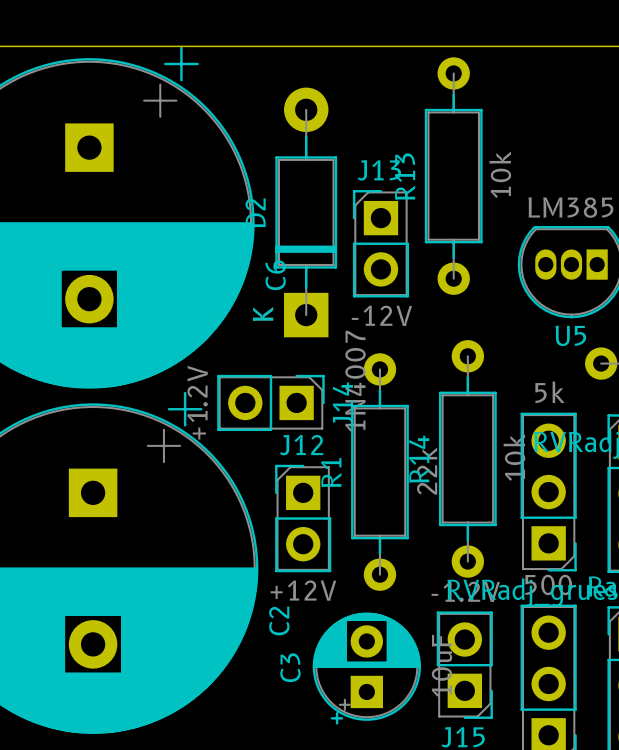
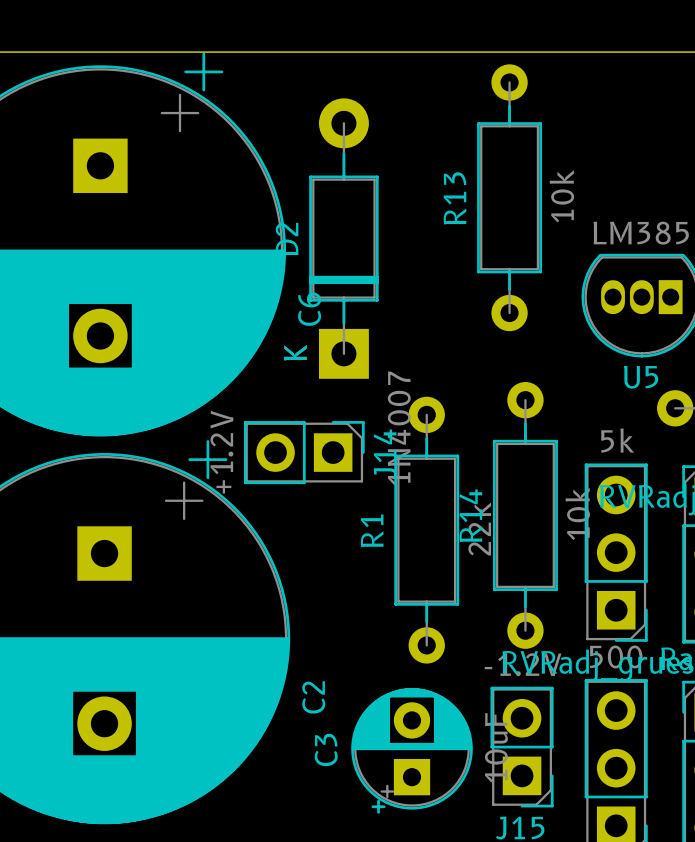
J13: -12V (380, 243) -> none
J12: +12V (303, 518) -> none

